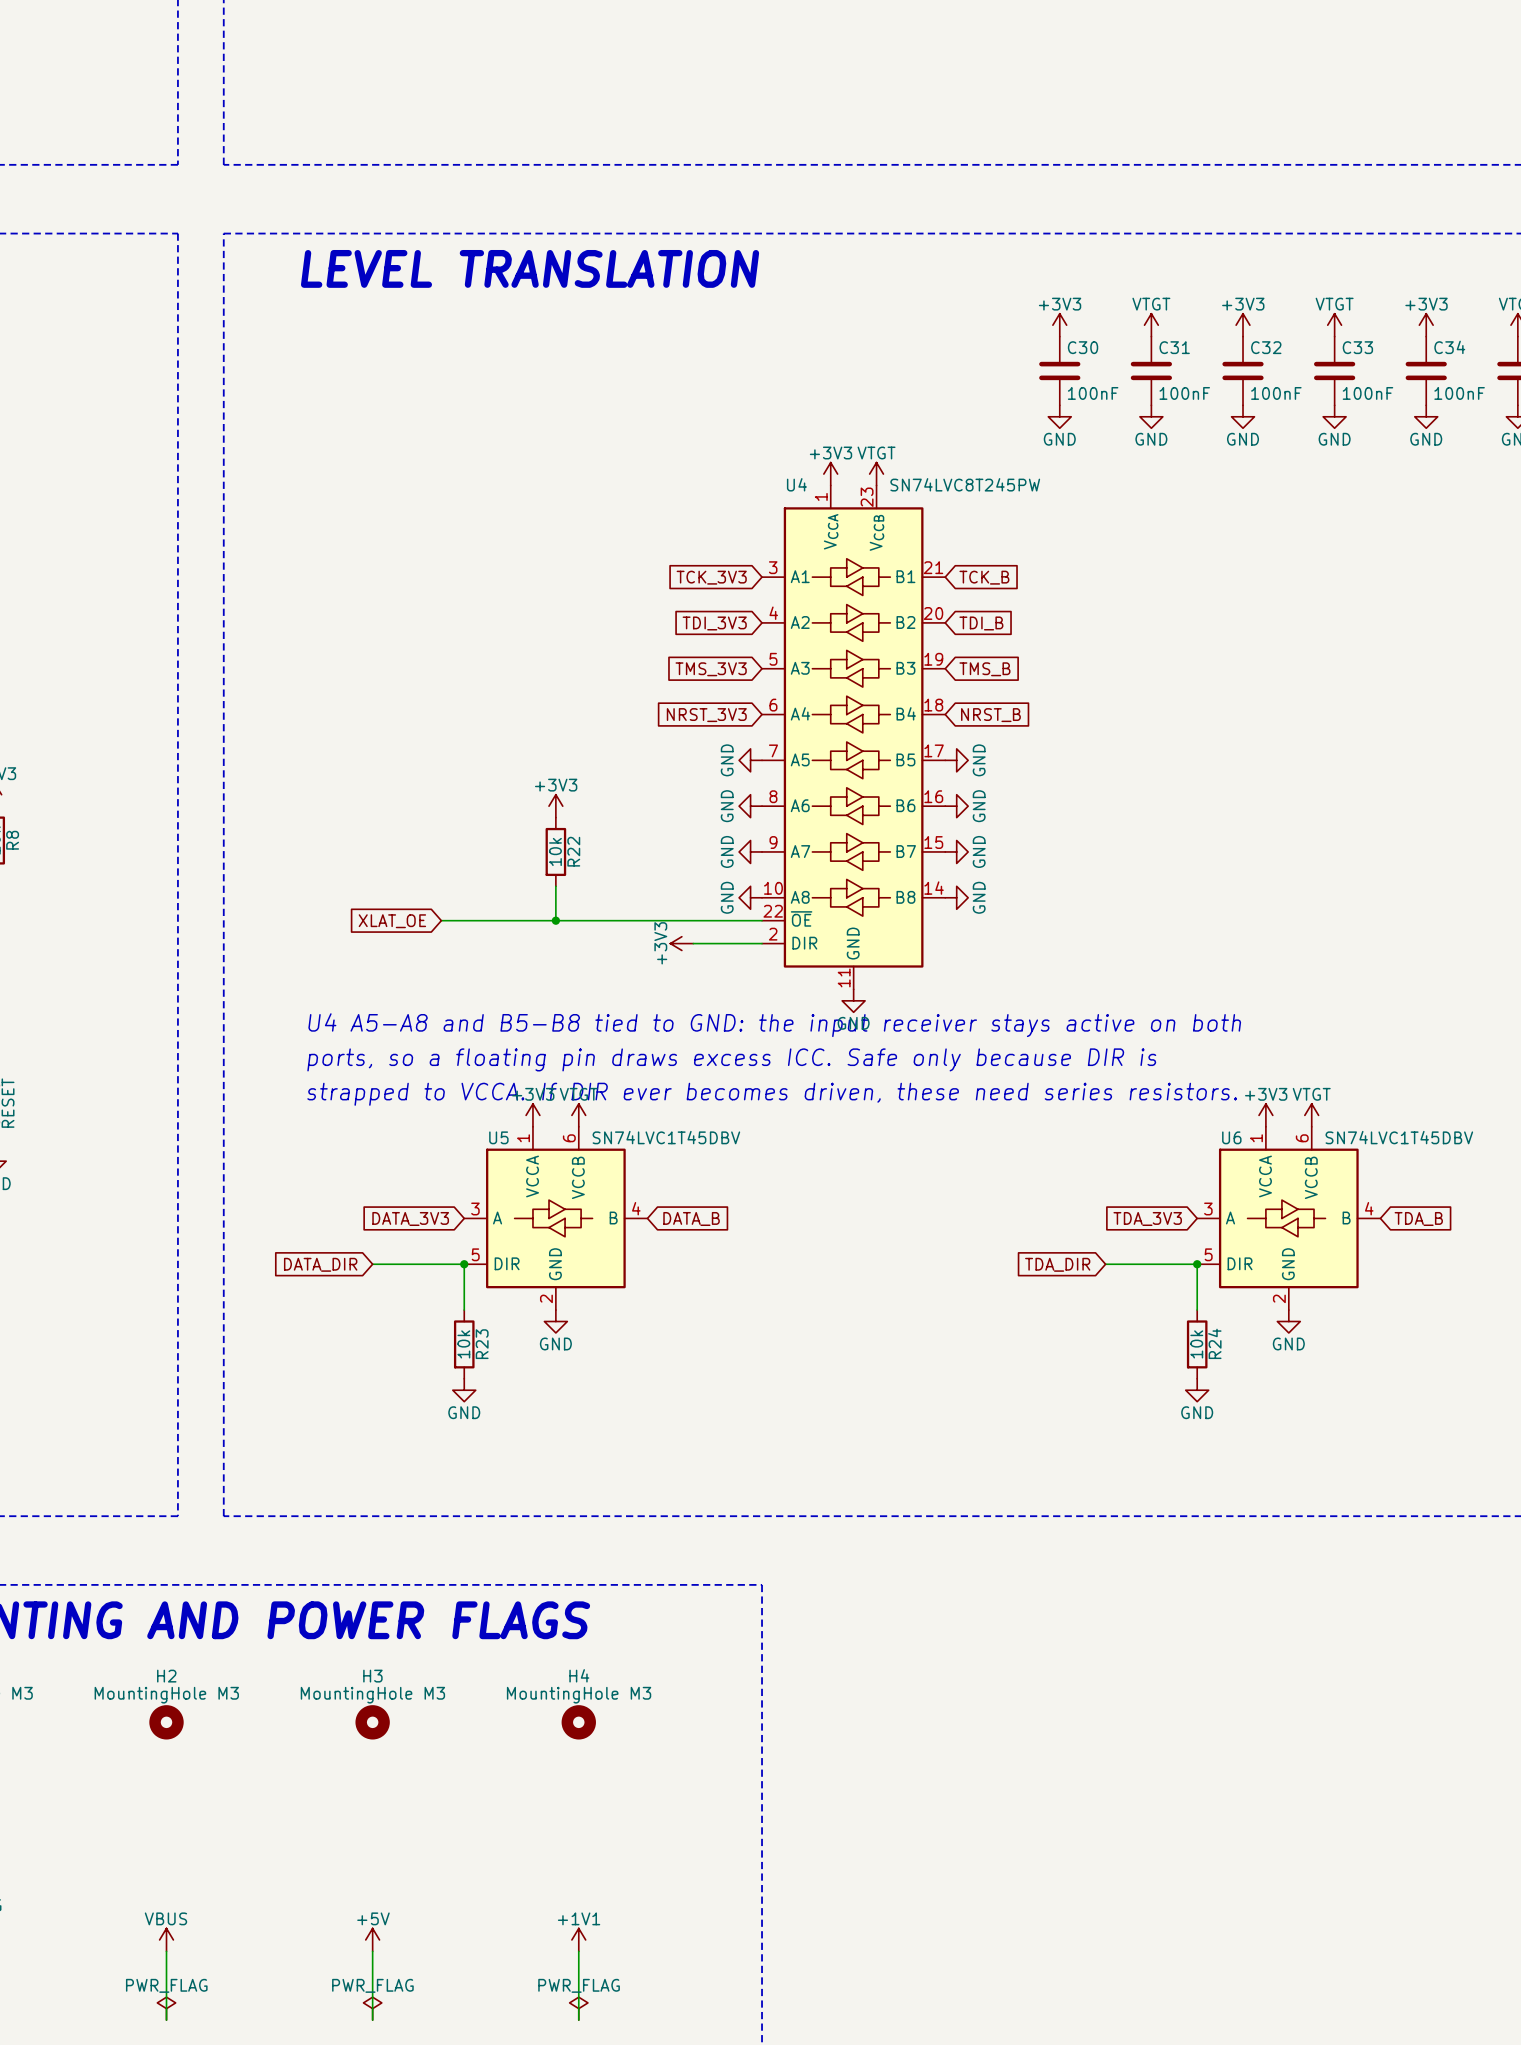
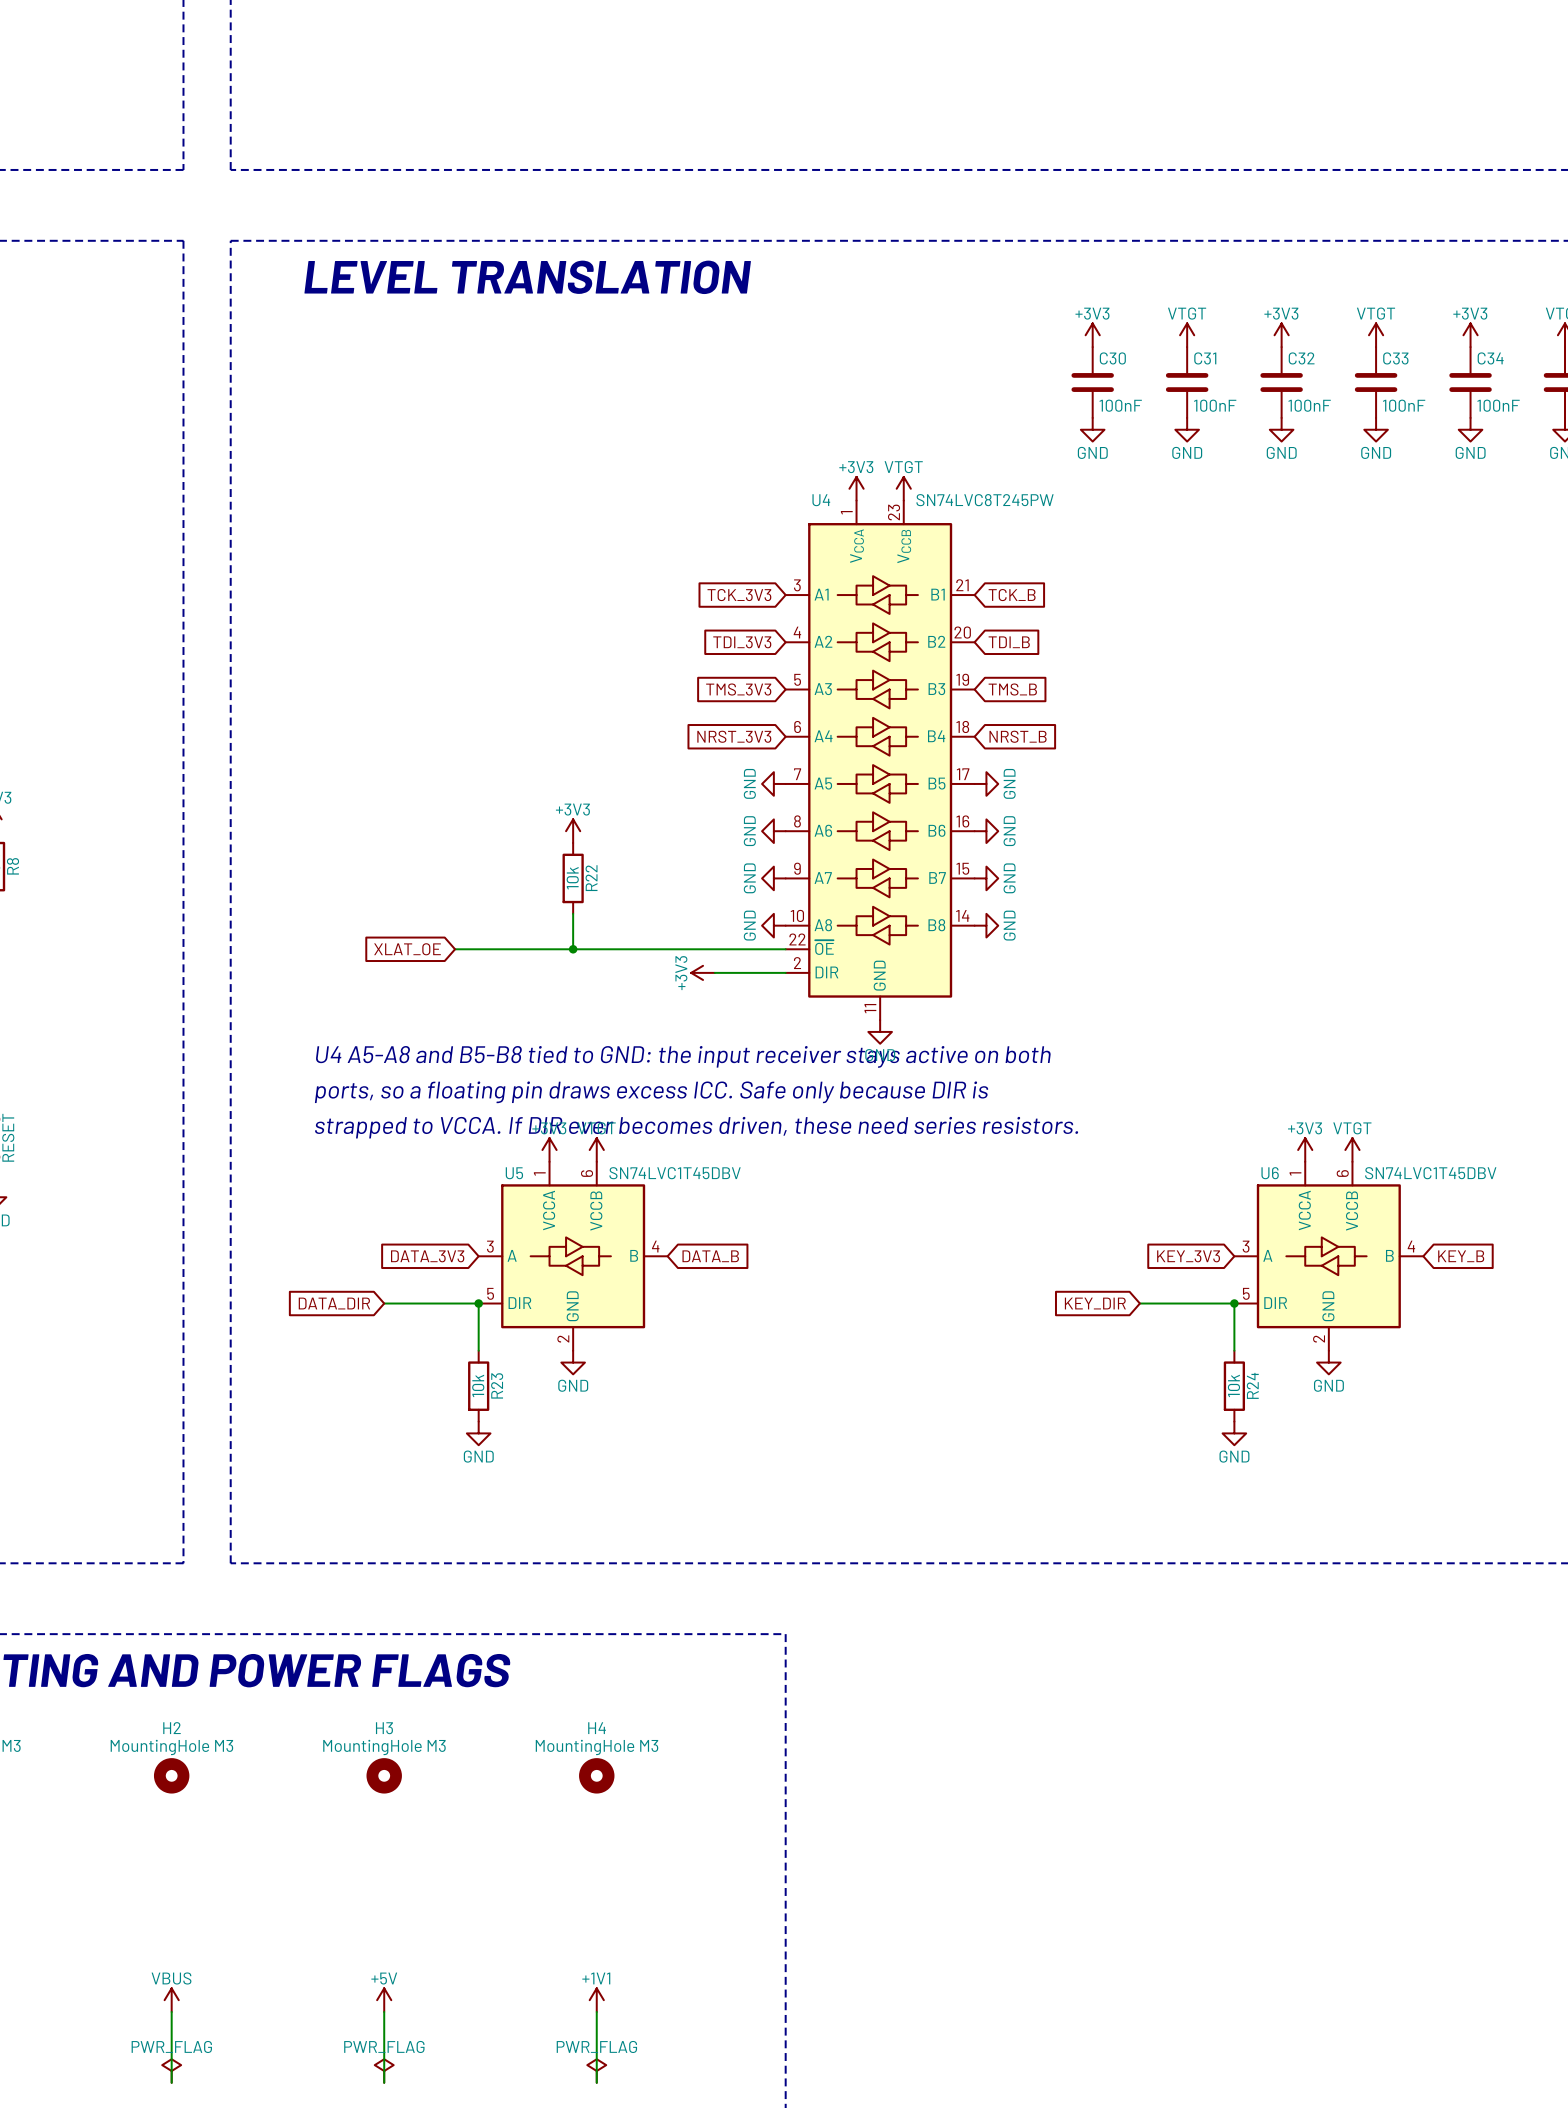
global label: TDA_3V3 (1147, 1218) -> KEY_3V3 (1188, 1256)
global label: TDA_B (1418, 1218) -> KEY_B (1461, 1256)
global label: TDA_DIR (1057, 1264) -> KEY_DIR (1095, 1303)

